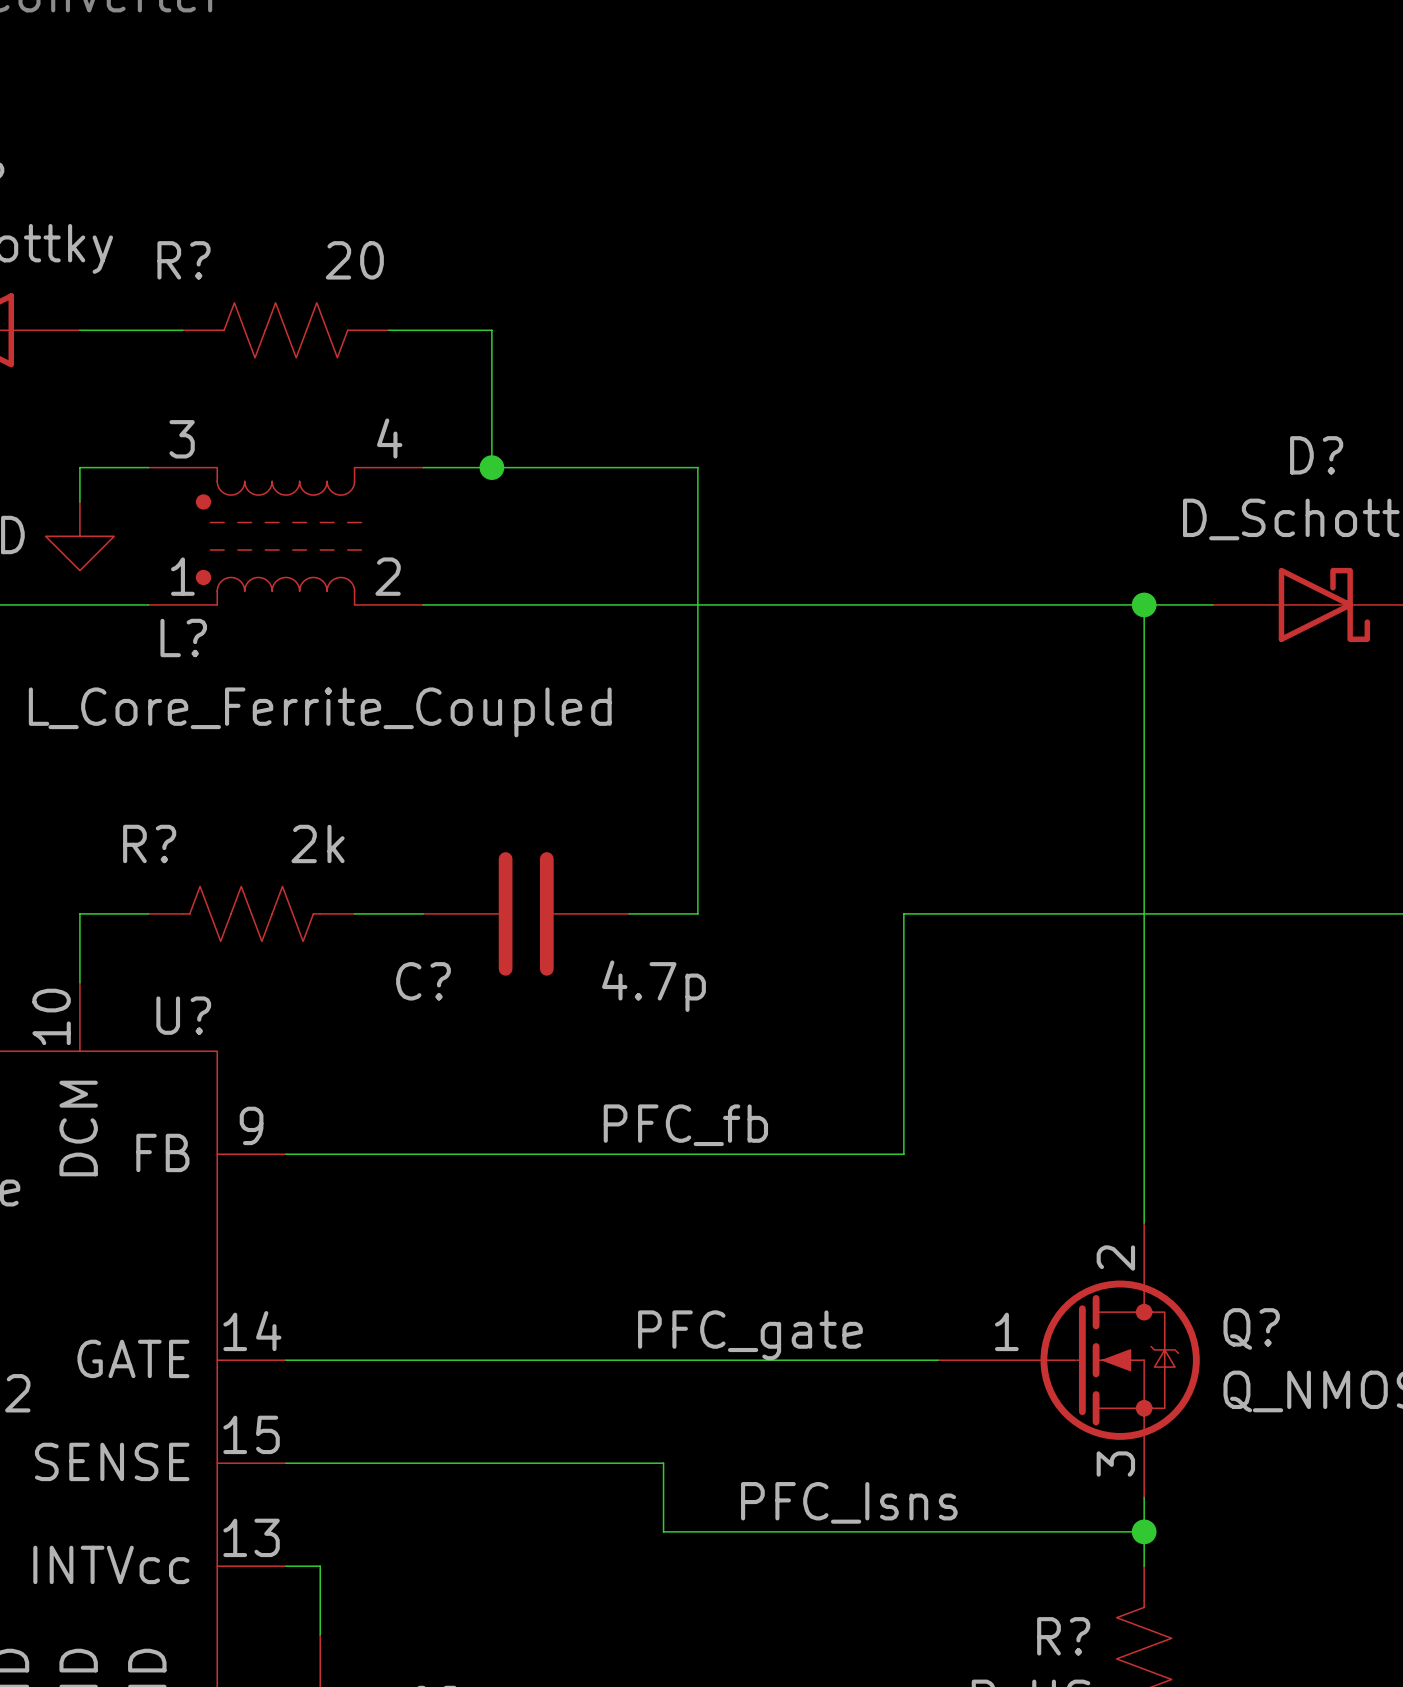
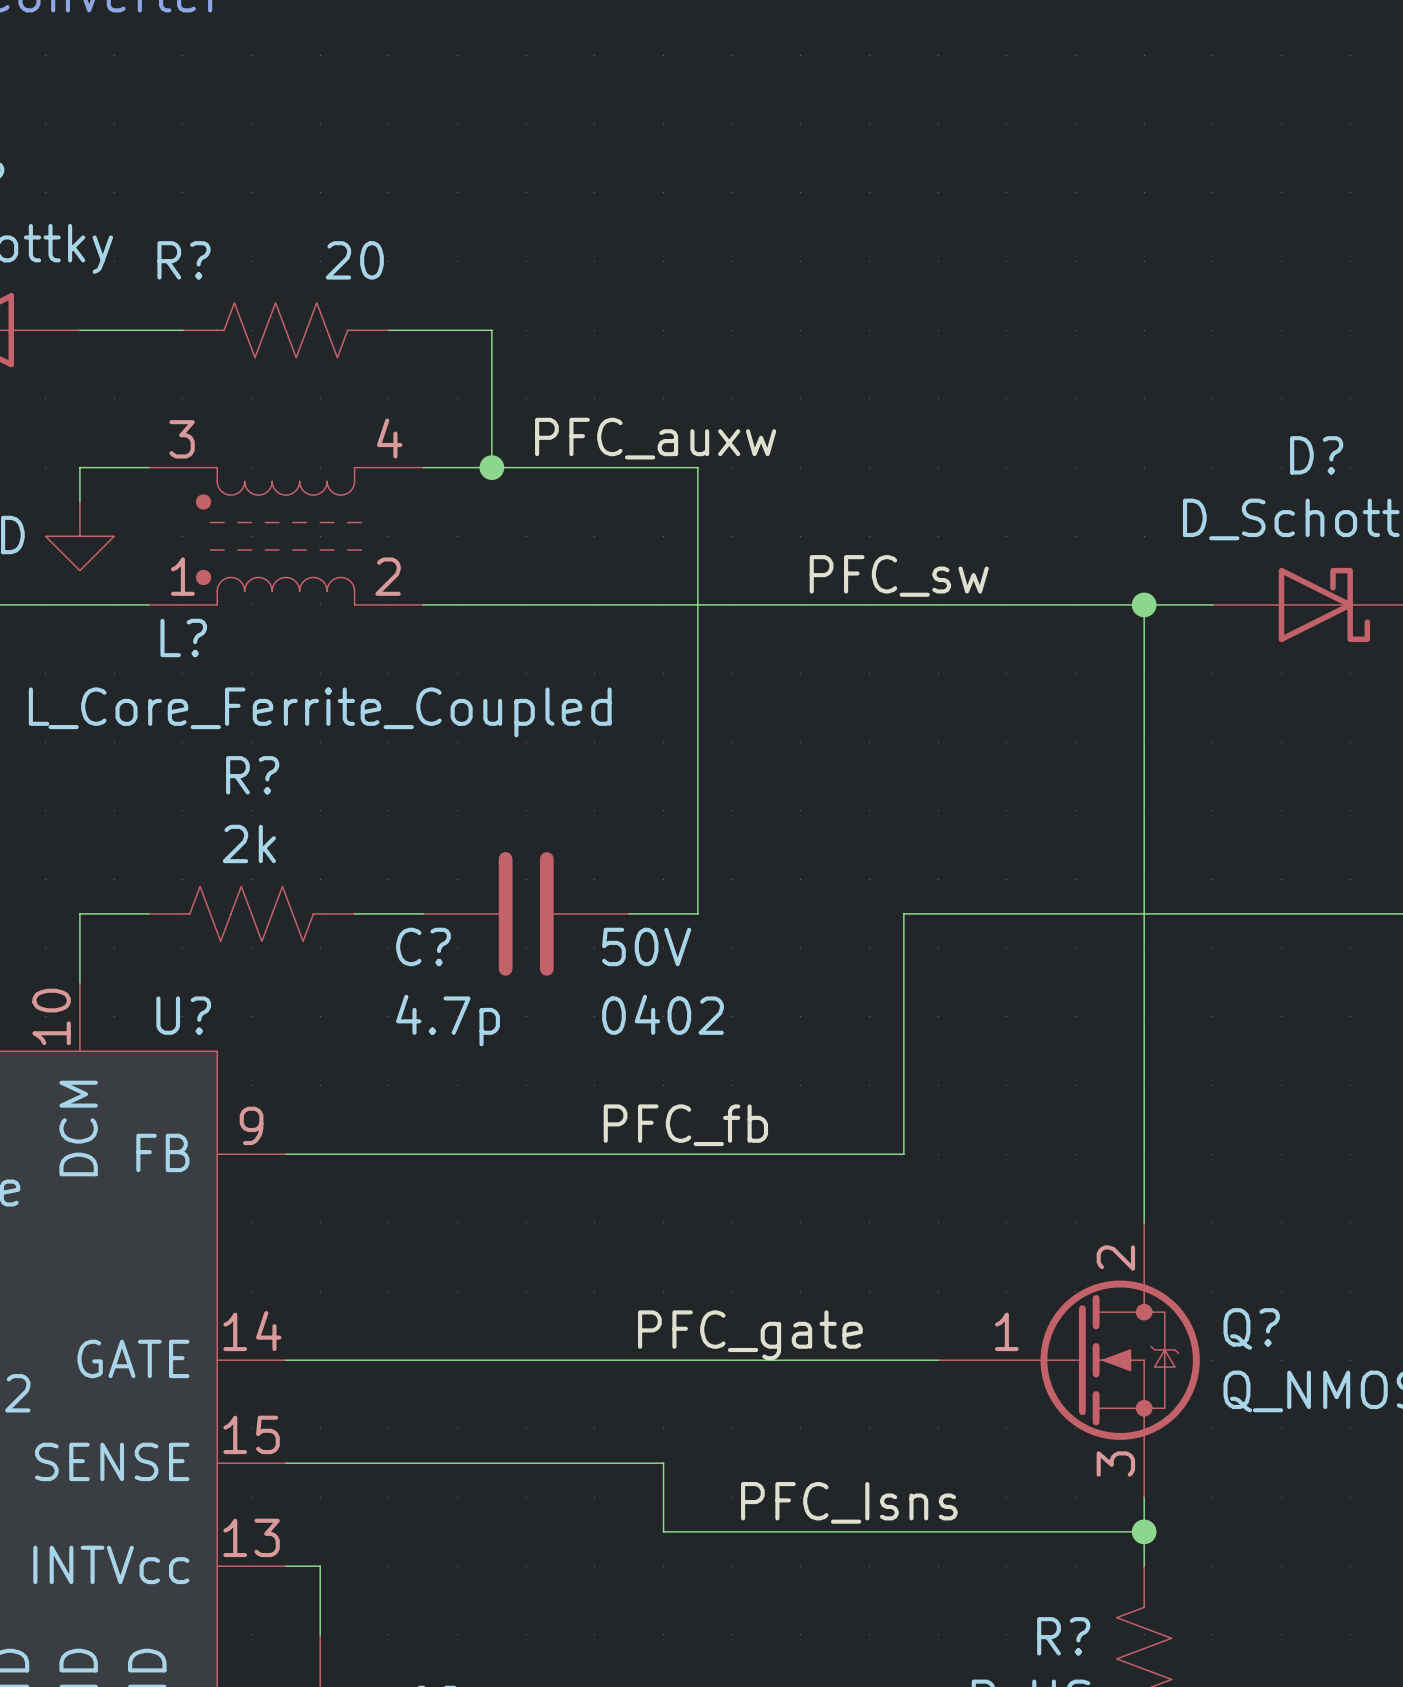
label: none -> PFC_auxw (655, 438)
label: none -> PFC_sw (899, 575)
R? name position: R? (149, 843) -> R? (252, 775)
R? value position: 2k (318, 843) -> 2k (249, 843)
C? text: none -> 50V (646, 946)
C? name position: C? (423, 981) -> C? (423, 946)
C? value position: 4.7p (653, 986) -> 4.7p (448, 1020)
C? text: none -> 0402 (662, 1014)

